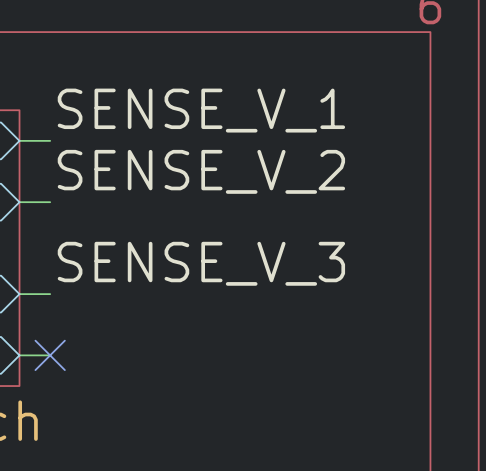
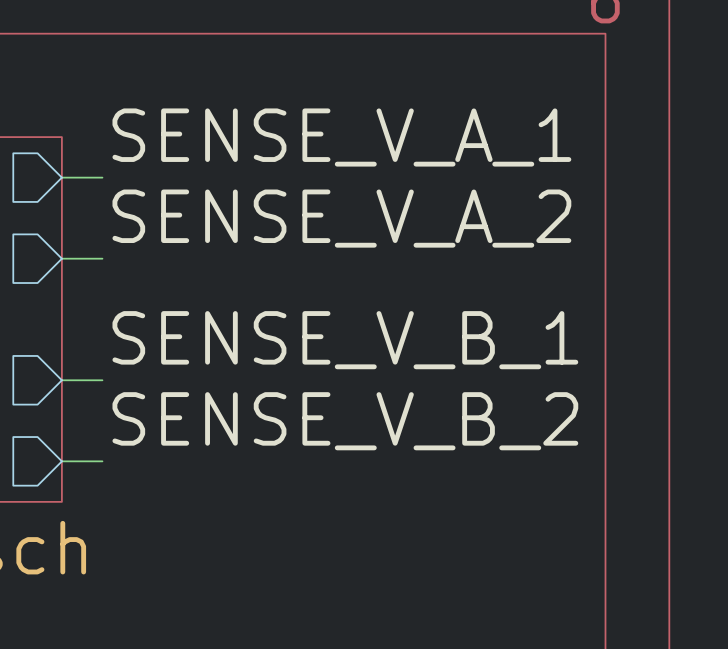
label: SENSE_V_1 (201, 110) -> SENSE_V_A_1 (341, 137)
label: SENSE_V_2 (201, 171) -> SENSE_V_A_2 (341, 218)
label: SENSE_V_3 (201, 263) -> SENSE_V_B_1 (345, 340)
label: none -> SENSE_V_B_2 (345, 421)
no-connect mark: (50, 355) -> none

